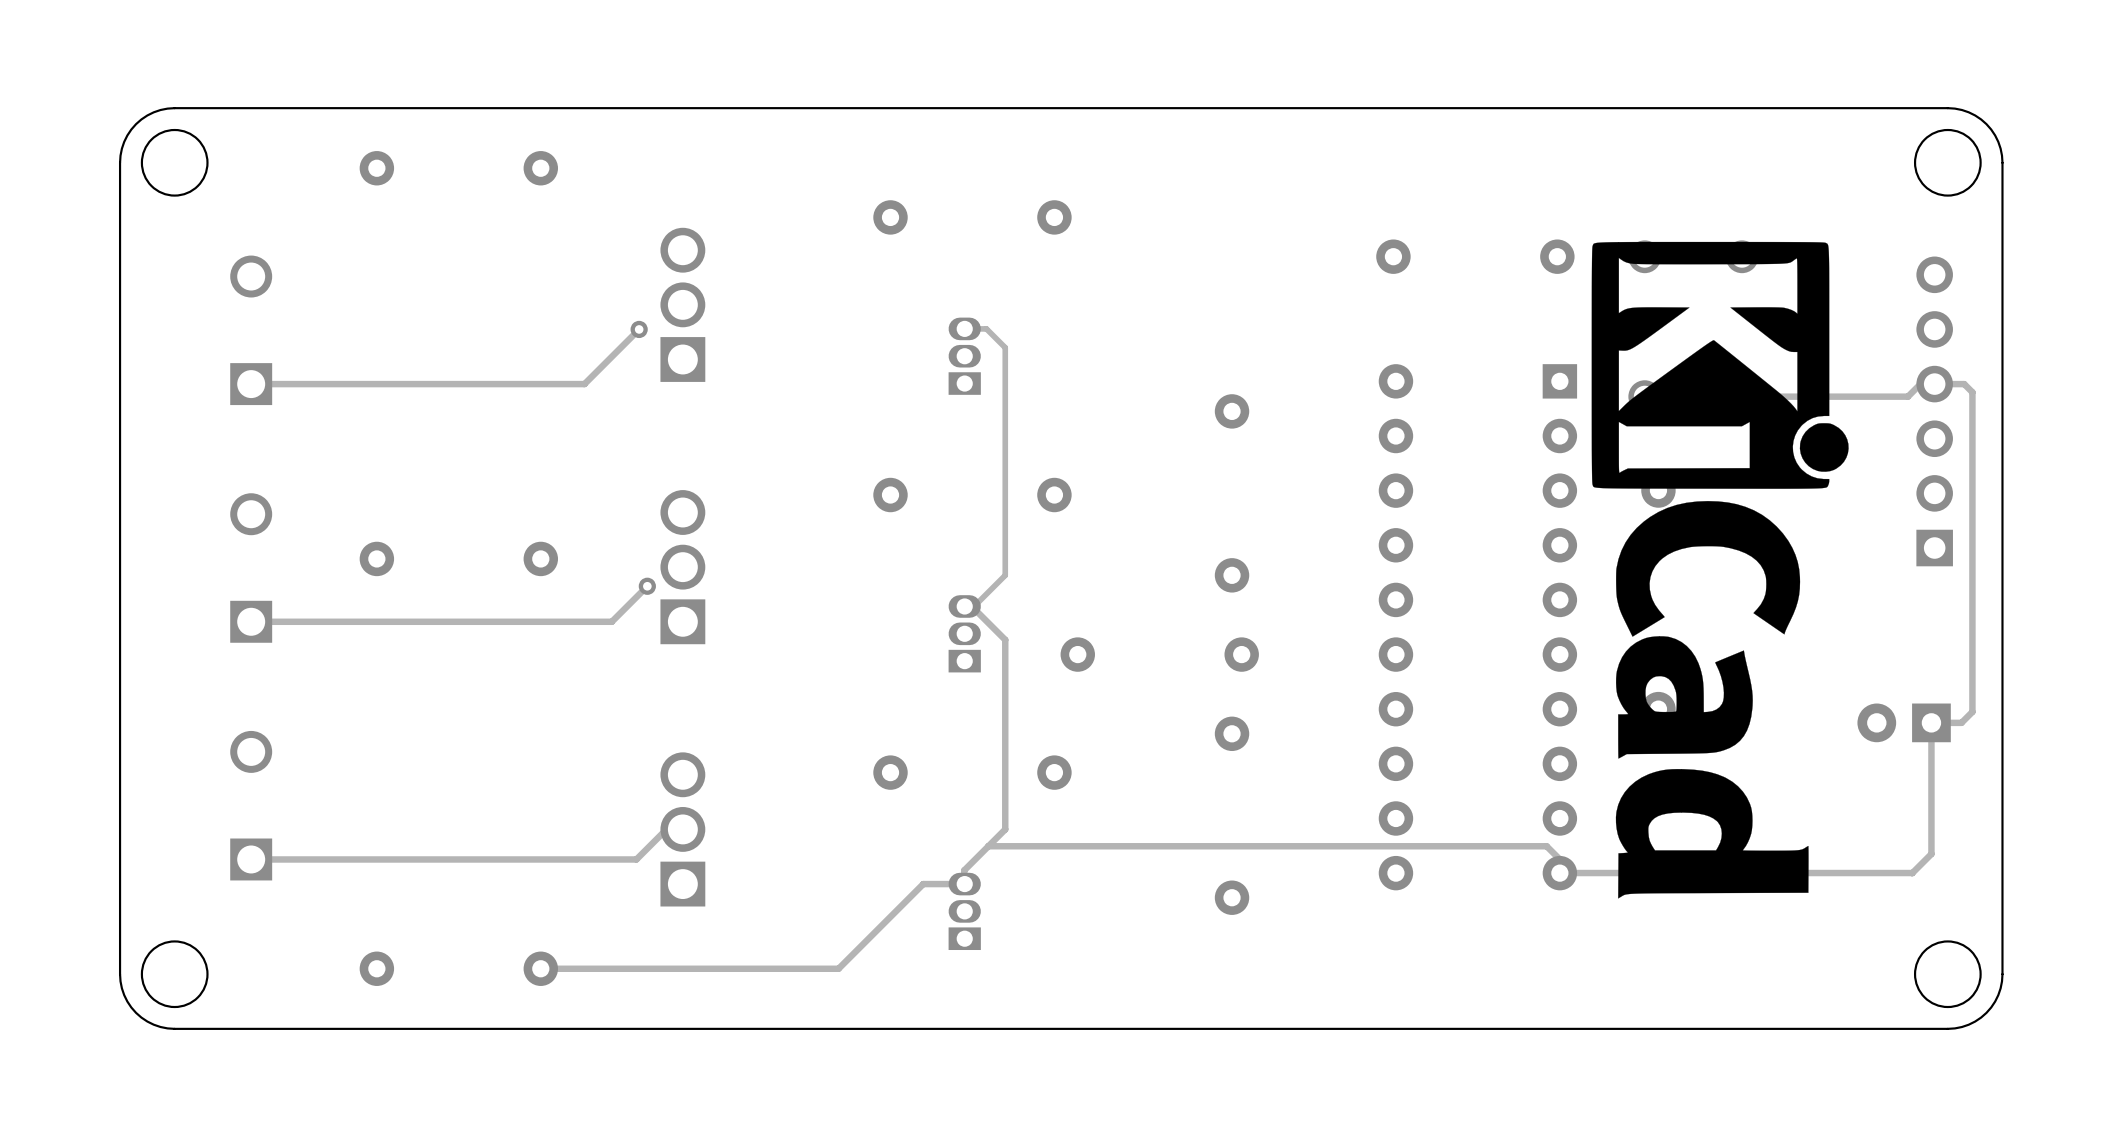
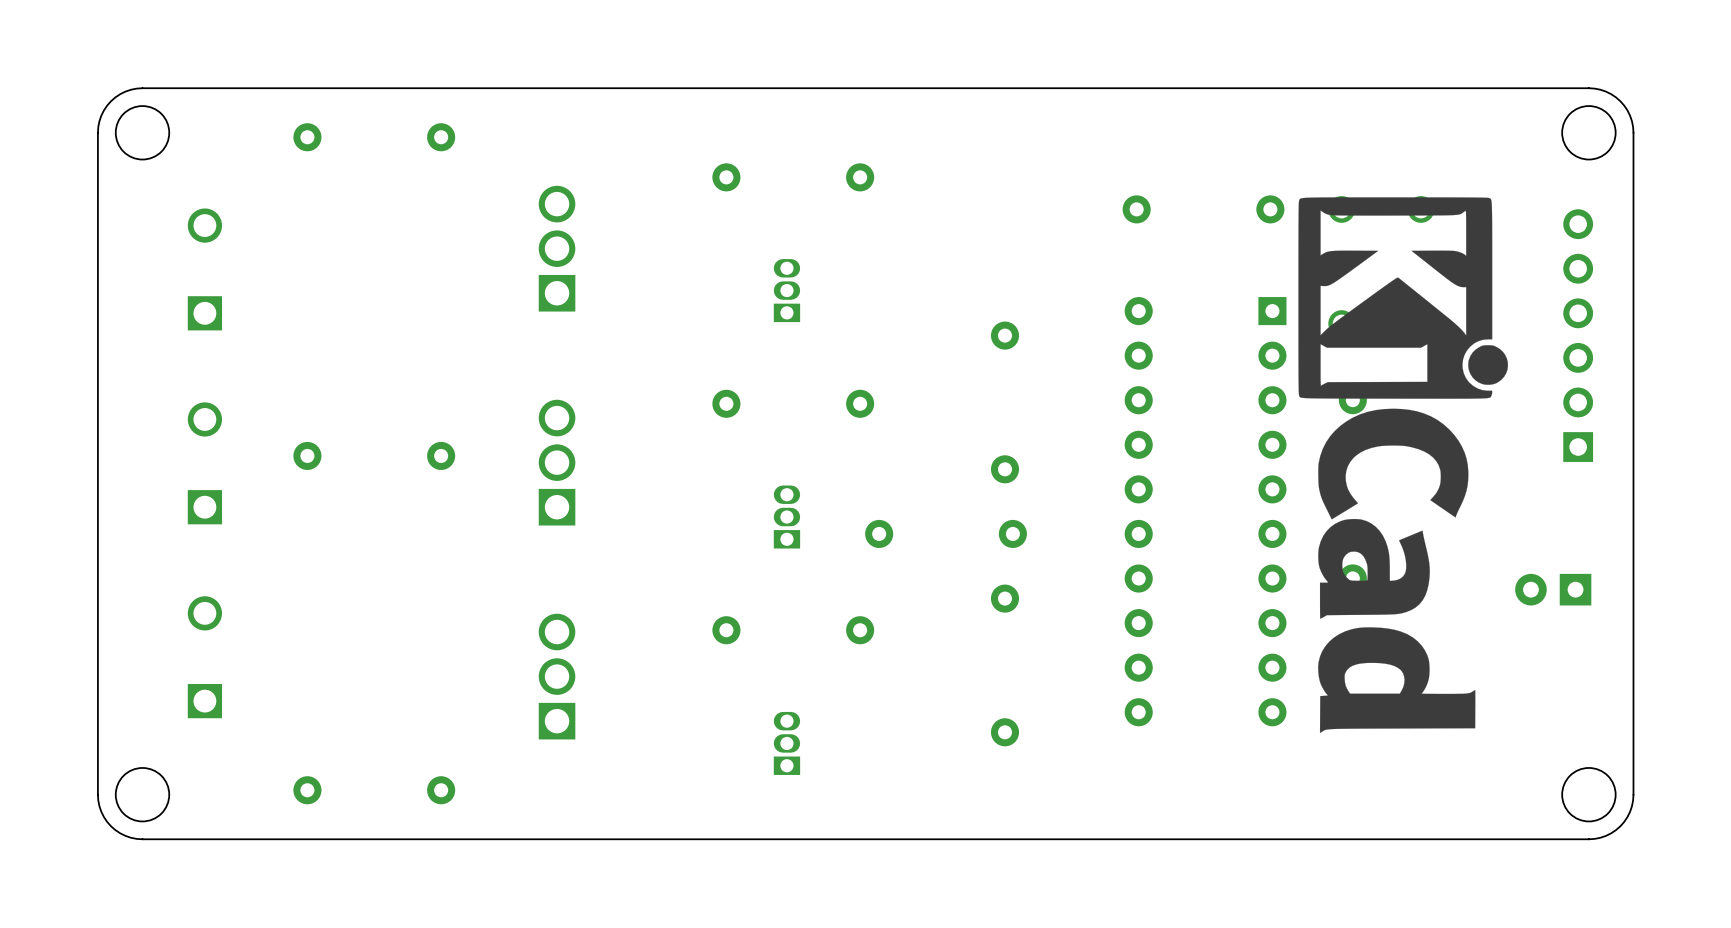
track: (964, 328) (986, 328) (1005, 347) (1005, 575) (974, 606) (964, 606) (971, 606) (1005, 639) (1005, 829) (964, 870) (964, 884) (923, 884) (838, 968) (540, 968) -> none
track: (639, 329) (584, 384) (251, 384) -> none
via: (639, 329) -> none
track: (1742, 396) (1907, 396) (1920, 384) (1964, 384) (1972, 392) (1972, 711) (1961, 722) (1931, 722) (1931, 854) (1912, 873) -> none
track: (647, 586) (611, 621) (251, 621) -> none
via: (647, 586) -> none
track: (682, 829) (666, 829) (636, 859) (251, 859) -> none
track: (988, 846) (1546, 846) (1559, 859) (1559, 873) (1912, 873) -> none

